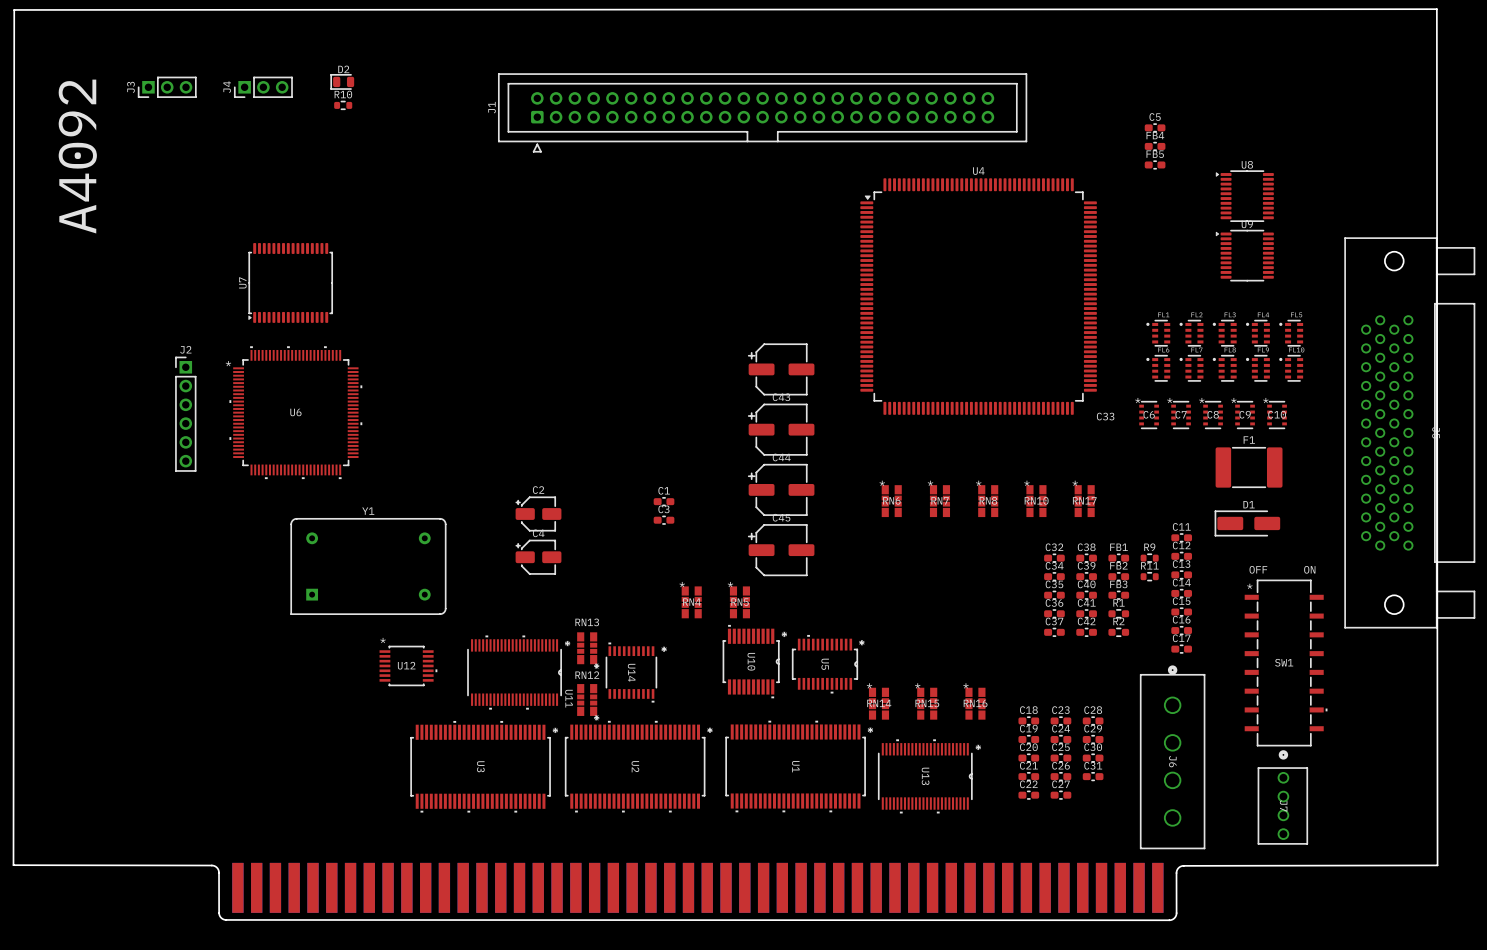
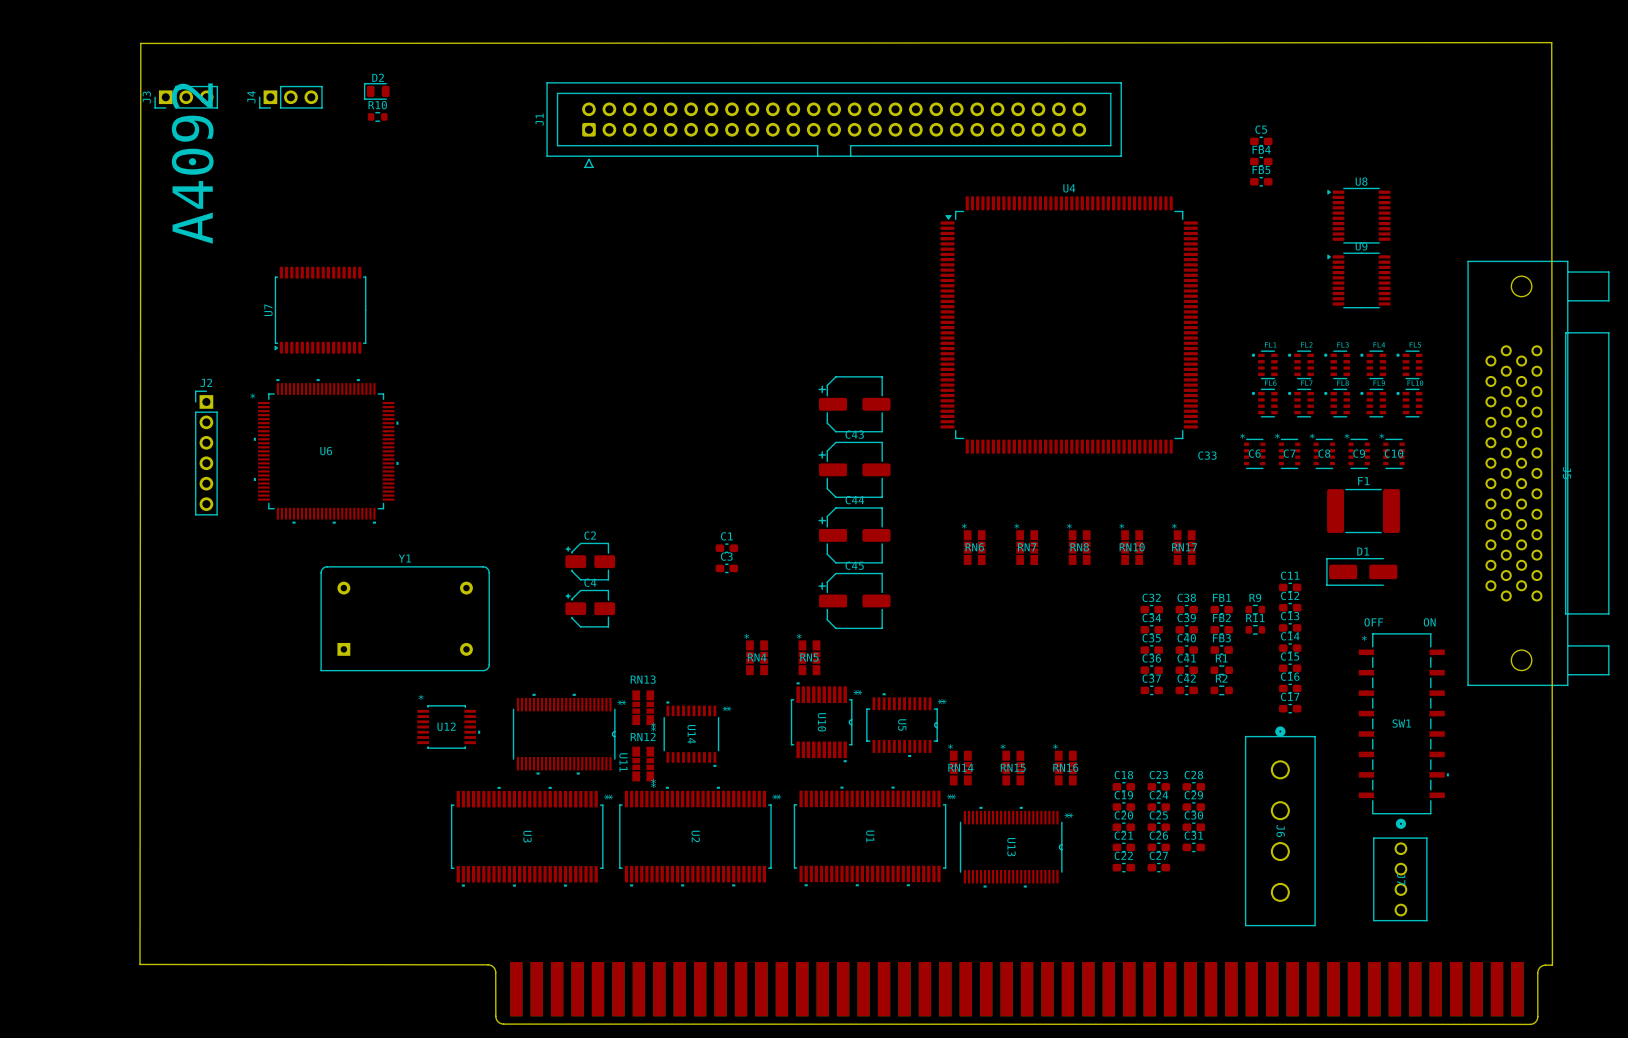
board edge: (1436, 9) (1437, 865) (1182, 866) (1176, 872) (1176, 914) (1173, 918) (1169, 920) (226, 919) (221, 918) (219, 914) (218, 871) (213, 865) (13, 865) (14, 9) (1436, 9) -> (1545, 965) (1552, 965) (1551, 42) (140, 43) (140, 964) (488, 964) (493, 967) (495, 971) (496, 1018) (498, 1022) (503, 1024) (1530, 1024) (1535, 1022) (1537, 1017) (1538, 971) (1540, 966) (1543, 965) (1544, 965) (1545, 965)
text position: A4092 (77, 156) -> A4092 (192, 163)
part: (697, 887) -> none
part: none -> (1016, 989)

